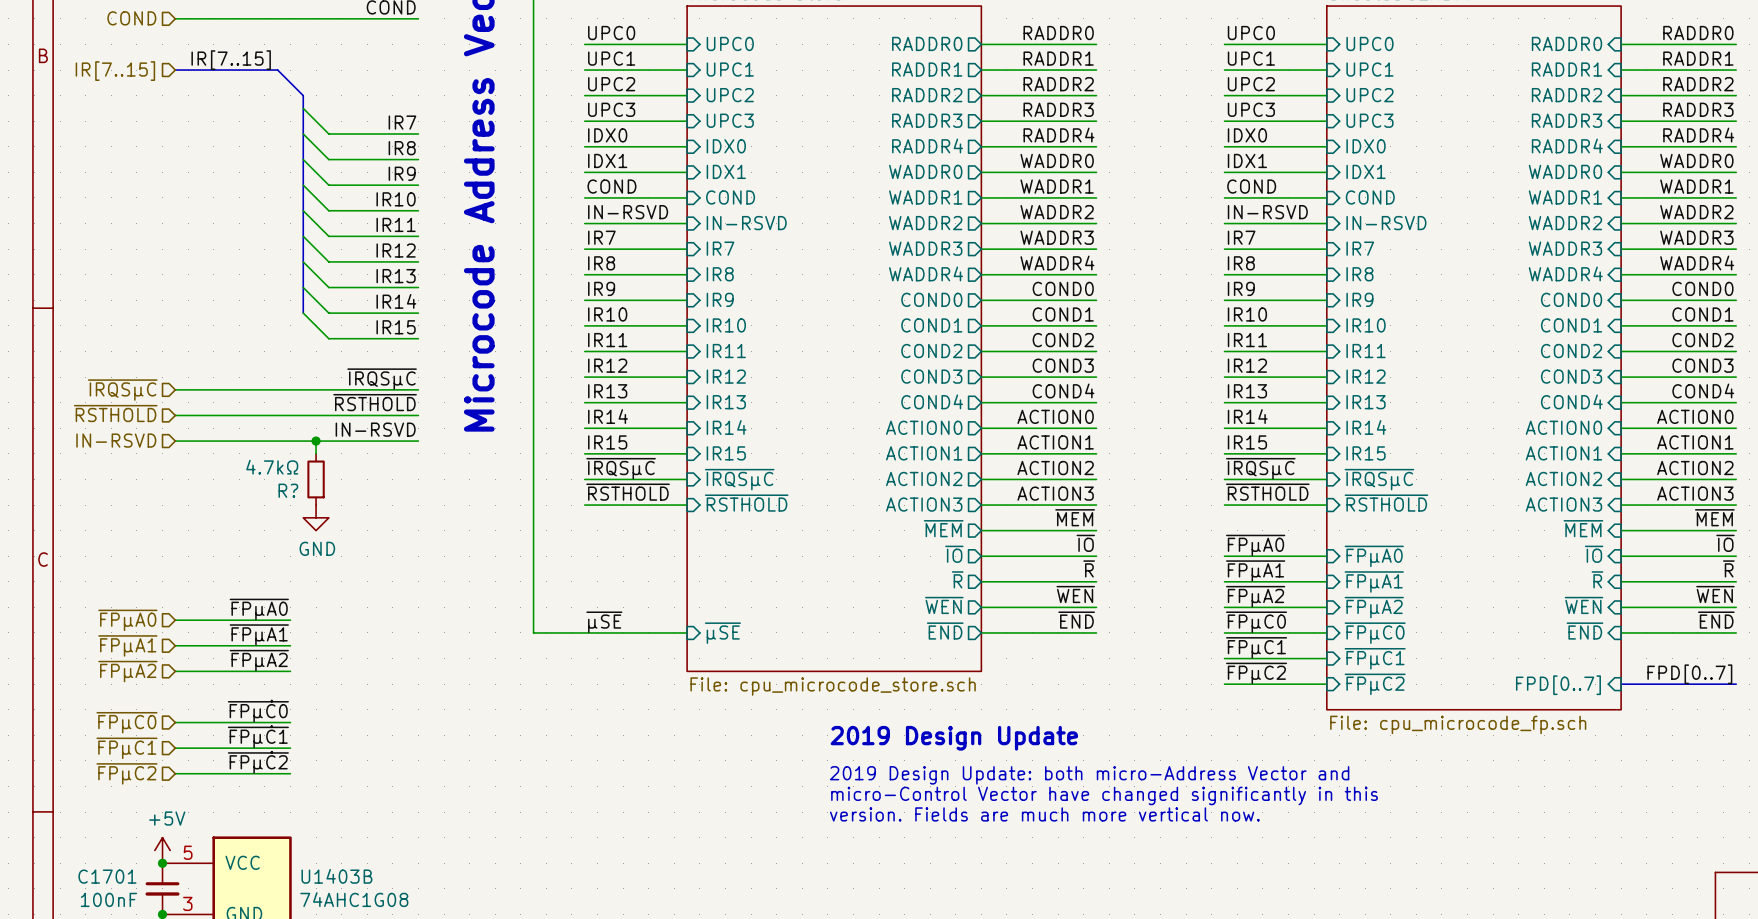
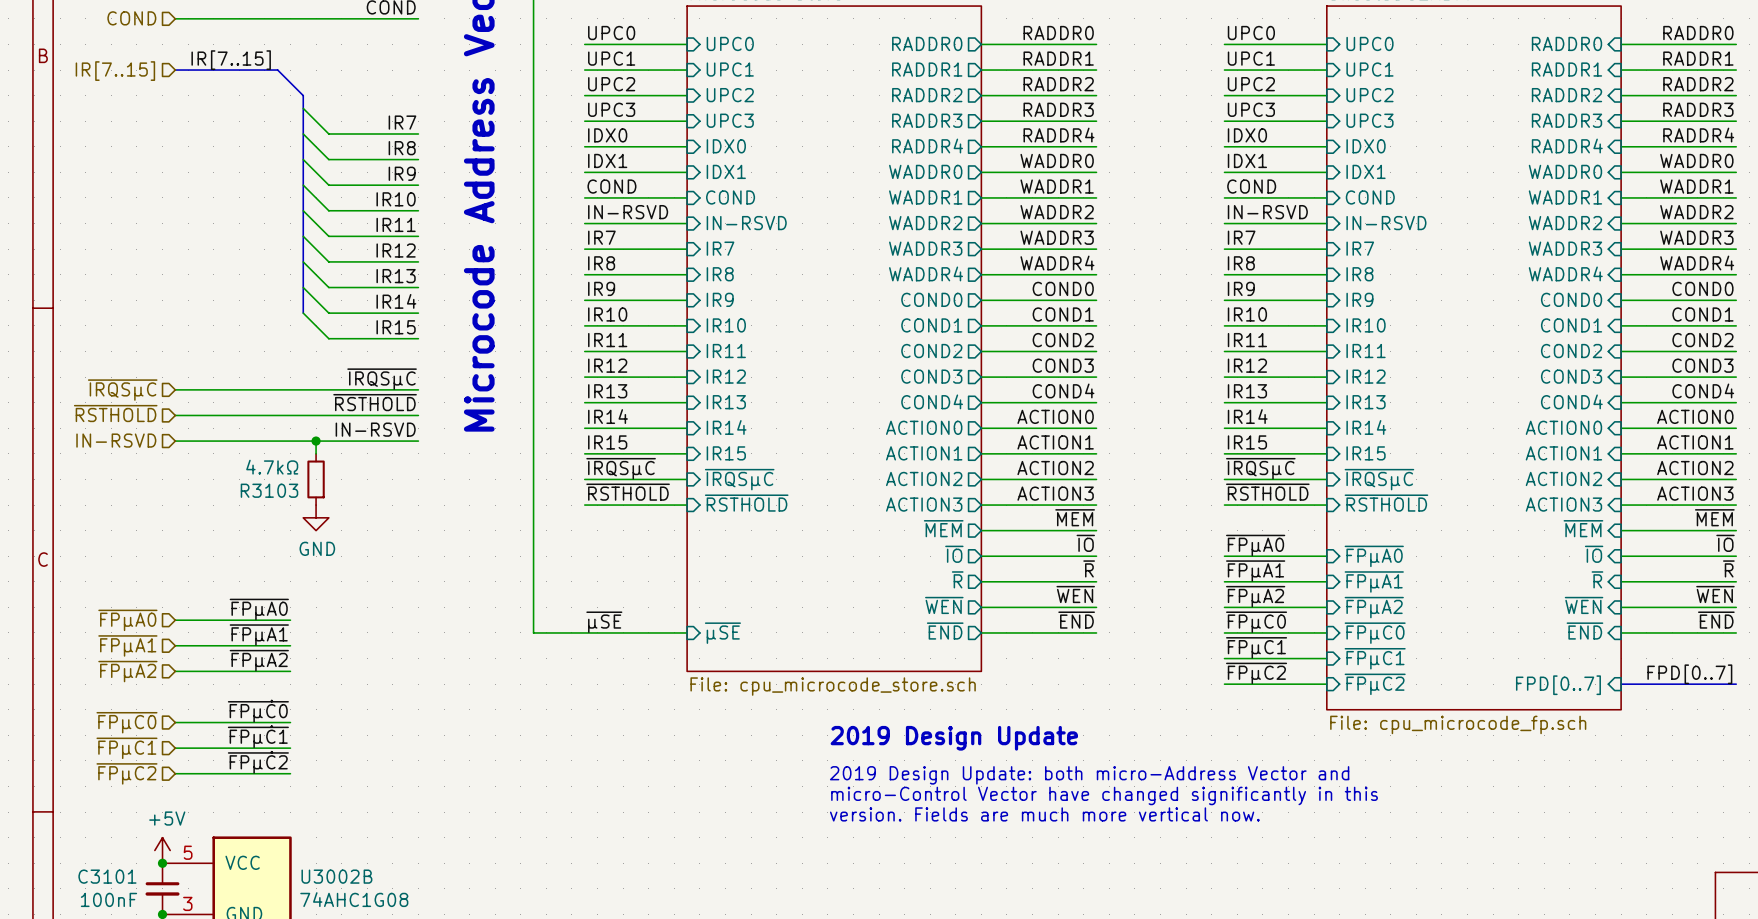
R? name: R? (288, 490) -> R3103 (269, 490)
C1701 name: C1701 (107, 876) -> C3101 (107, 876)
U1403B name: U1403B (336, 876) -> U3002B (336, 876)

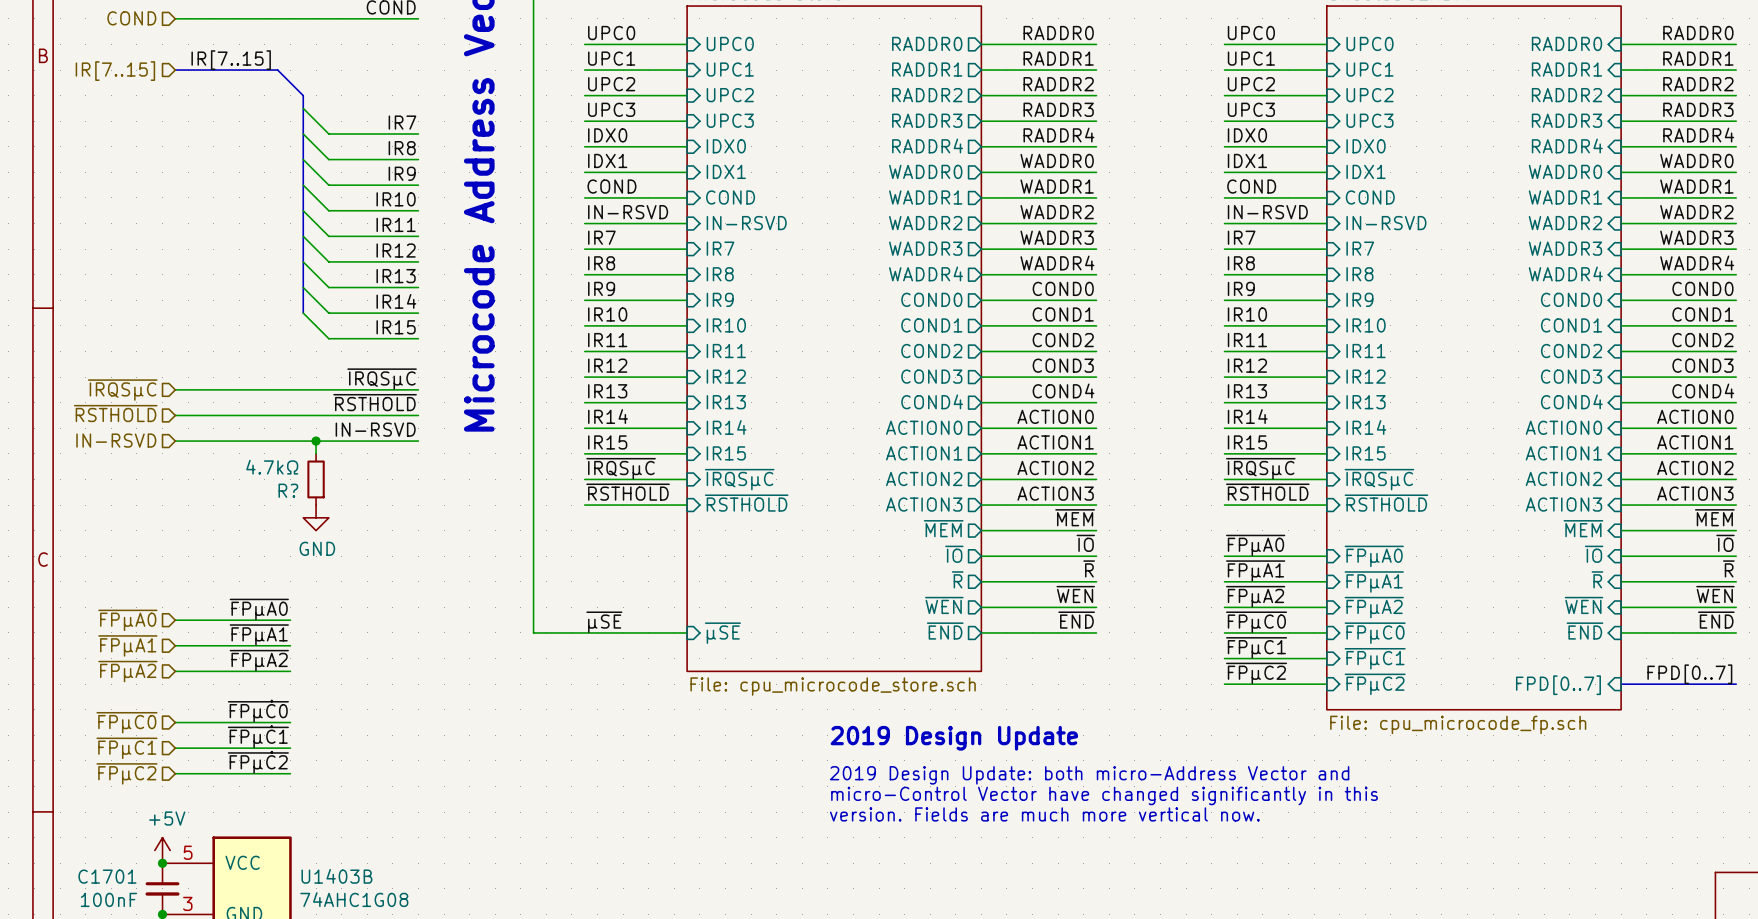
R3103 name: R3103 (269, 490) -> R? (288, 490)
C3101 name: C3101 (107, 876) -> C1701 (107, 876)
U3002B name: U3002B (336, 876) -> U1403B (336, 876)

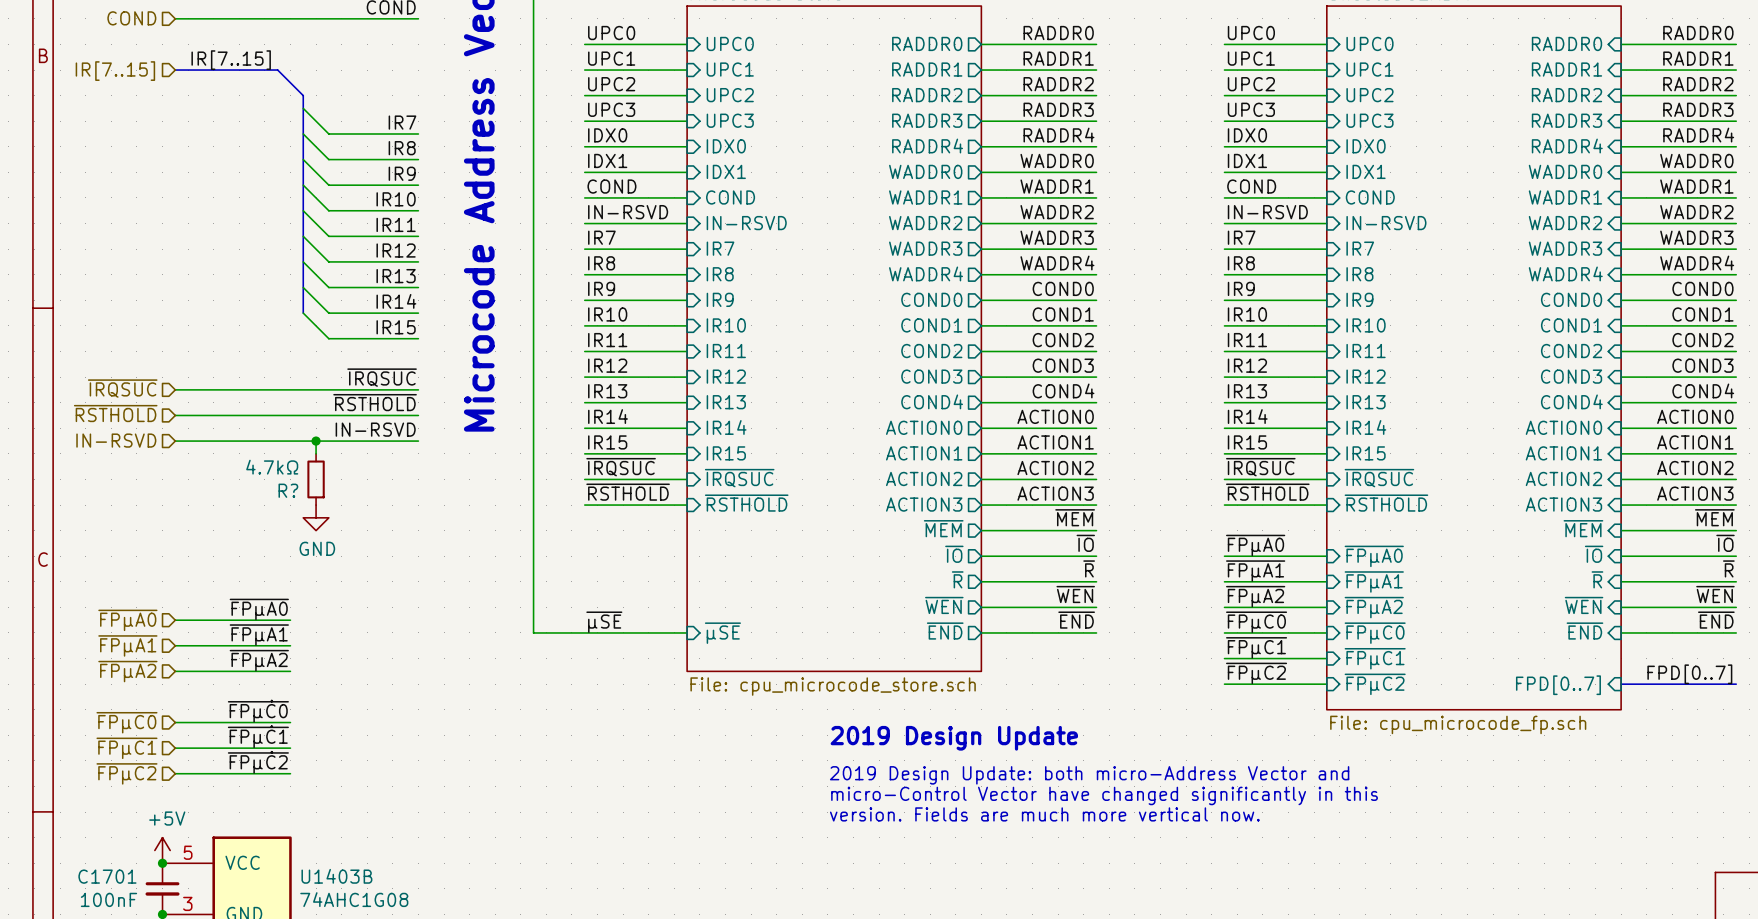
label: ~{IRQSµC} (382, 379) -> ~{IRQSUC} (382, 377)
hierarchical label: ~{IRQSµC} (122, 390) -> ~{IRQSUC} (122, 388)
label: ~{IRQSµC} (621, 468) -> ~{IRQSUC} (621, 467)
label: ~{IRQSµC} (1260, 468) -> ~{IRQSUC} (1260, 467)
sheet pin: ~{IRQSµC} (739, 479) -> ~{IRQSUC} (739, 478)
sheet pin: ~{IRQSµC} (1379, 479) -> ~{IRQSUC} (1379, 478)

